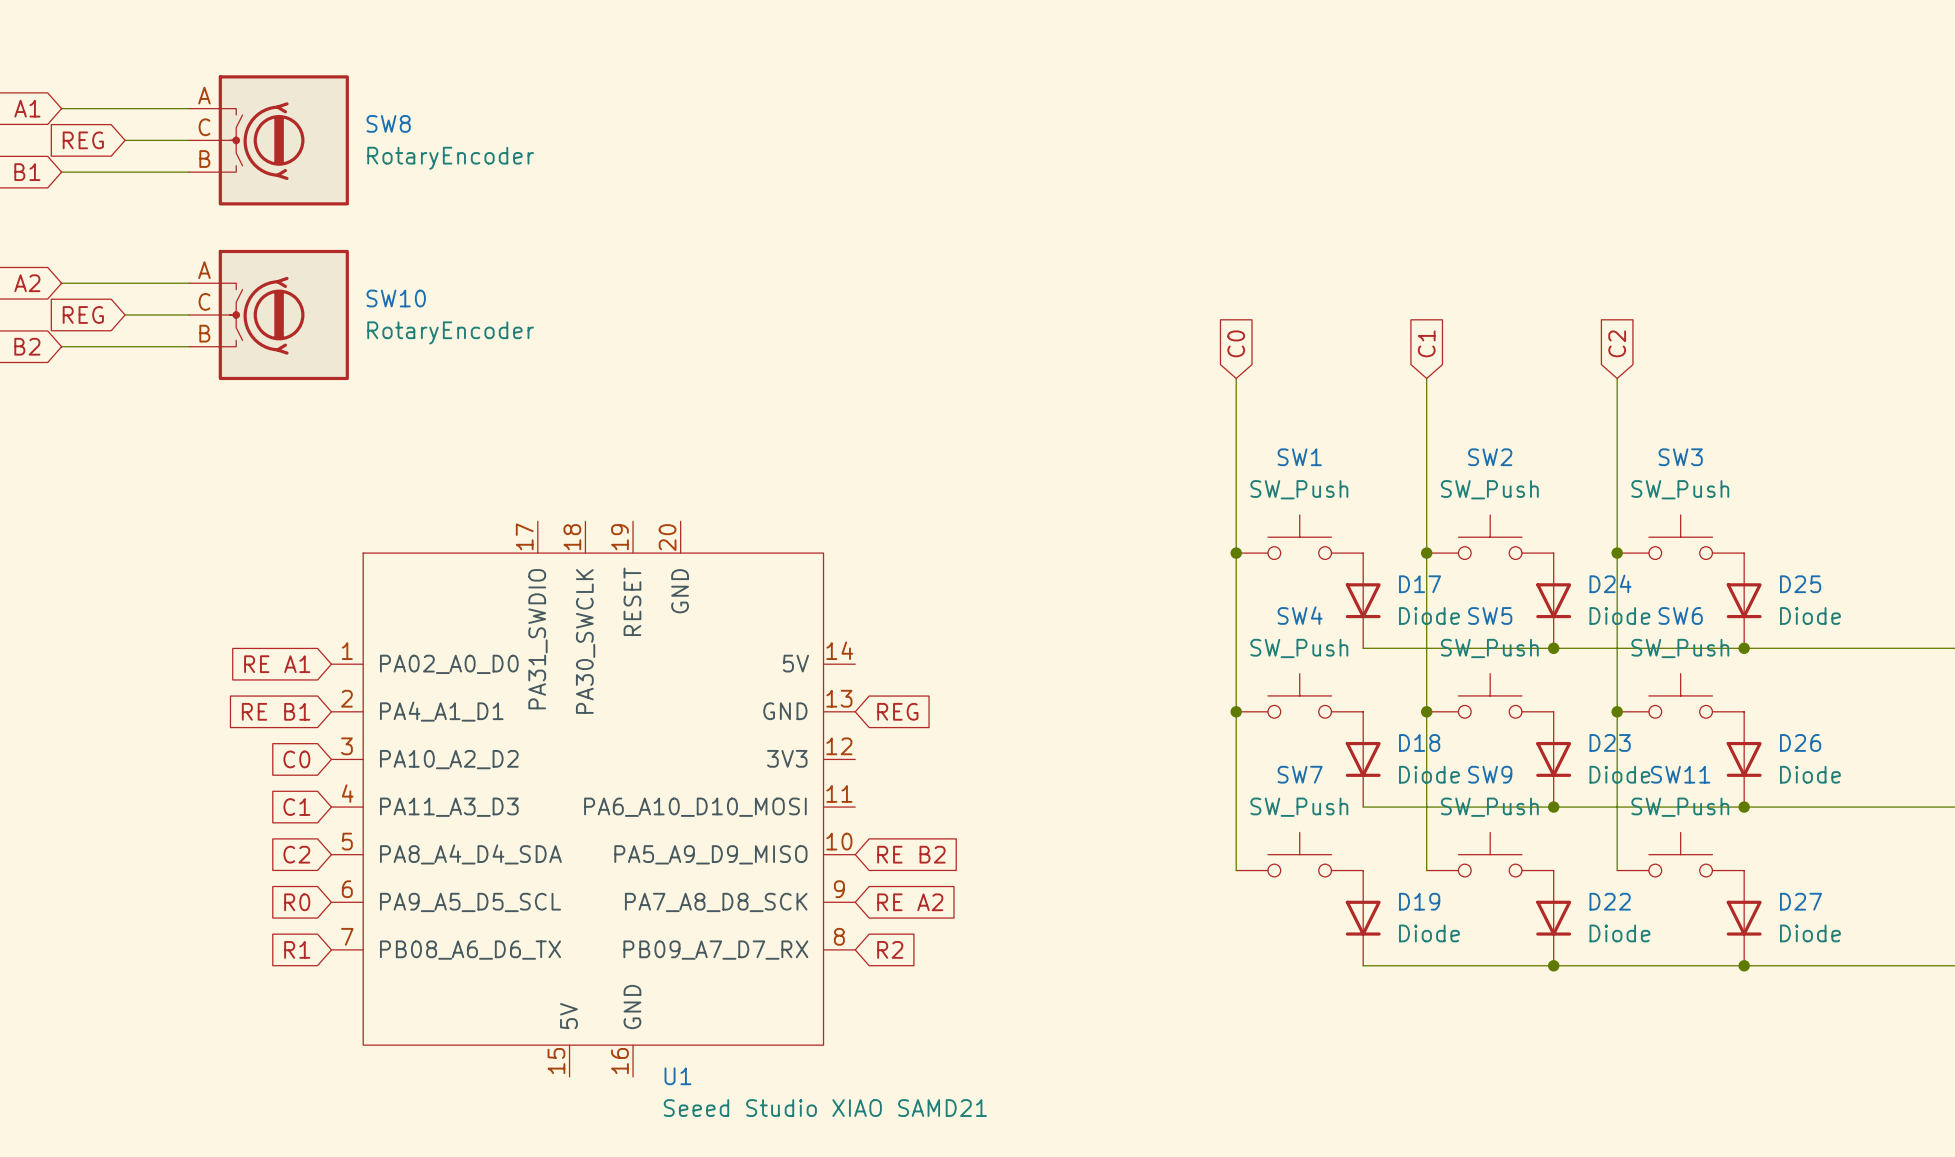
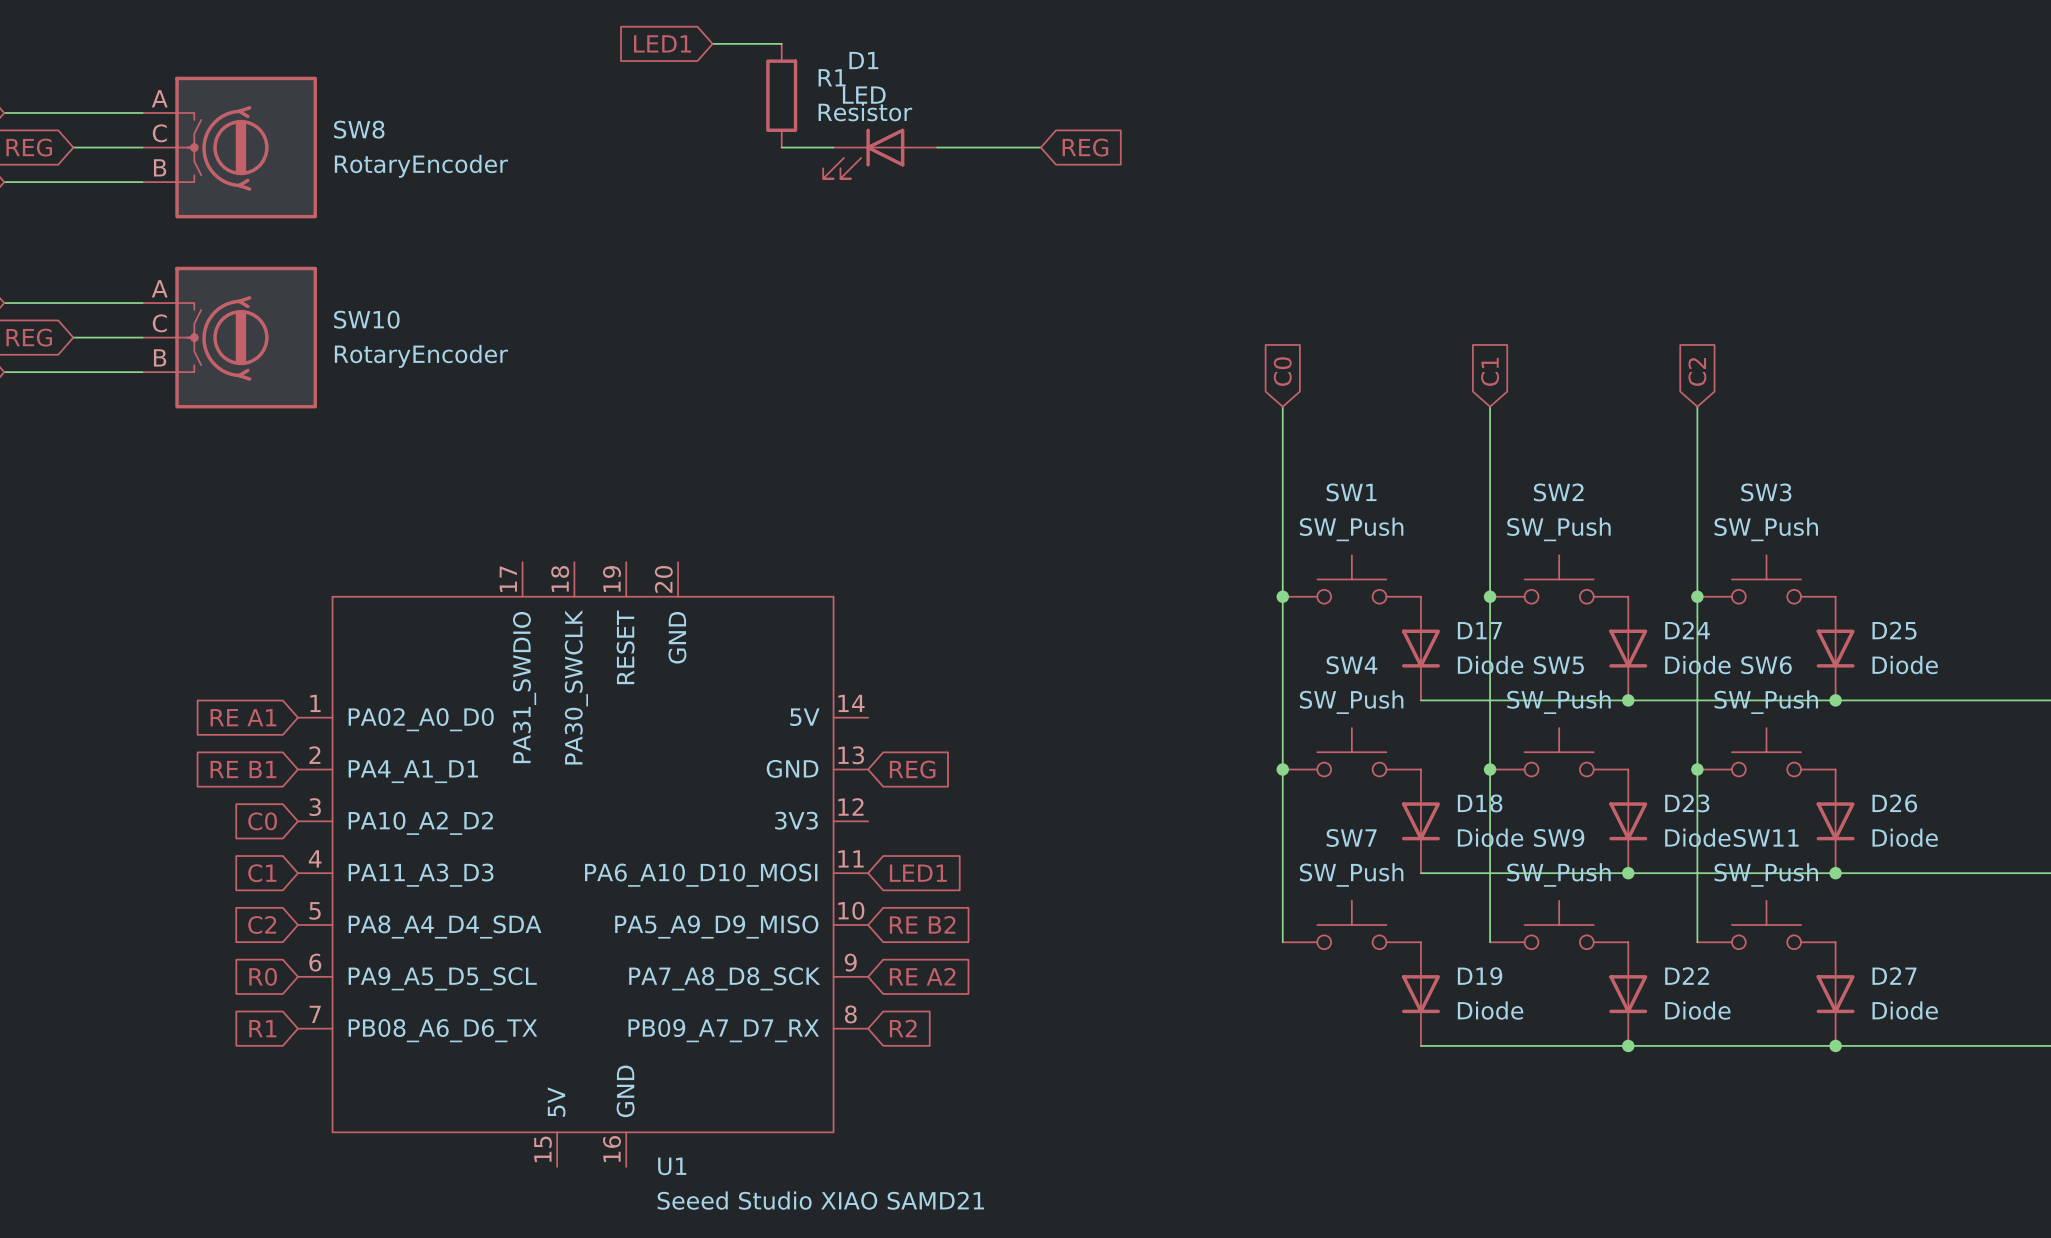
global label: none -> LED1 (662, 43)
wire: none -> (712, 43) (781, 43)
R1: none -> Resistor (781, 95)
wire: none -> (781, 147) (833, 147)
wire: none -> (937, 147) (1040, 147)
global label: none -> REG (1085, 147)
D1: none -> LED (880, 153)
global label: none -> LED1 (918, 873)

